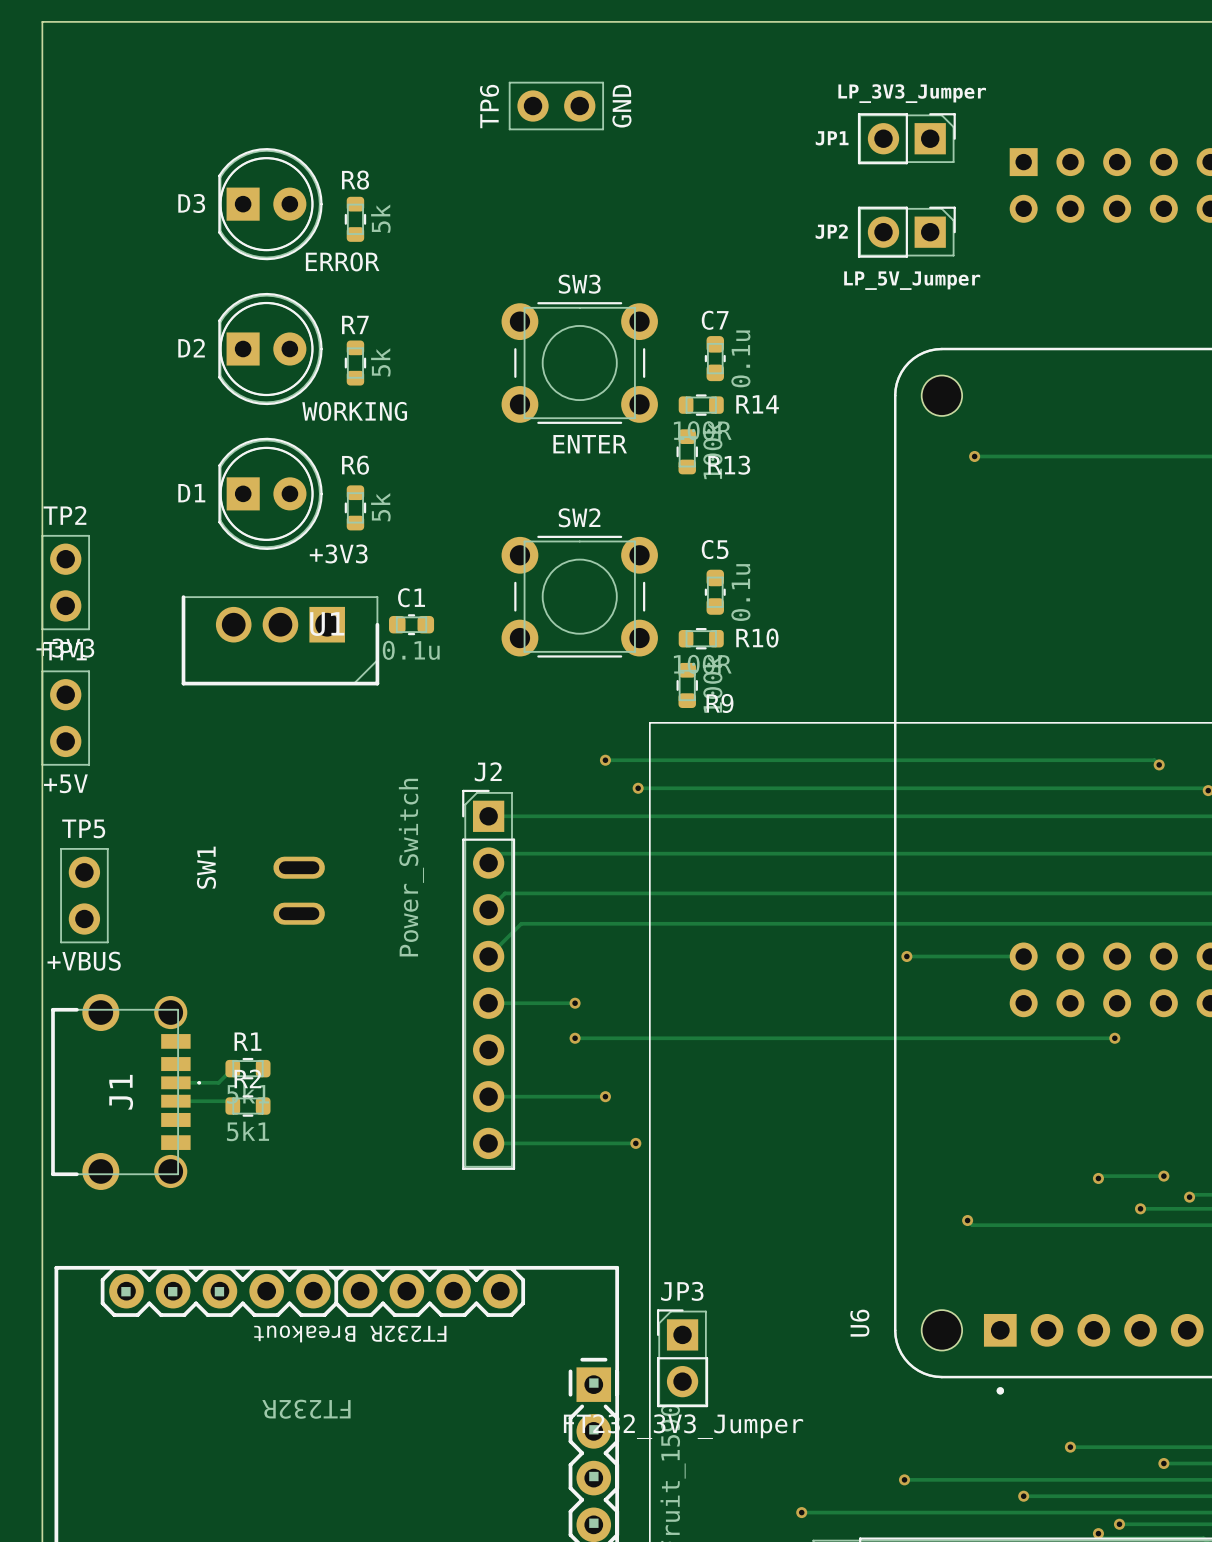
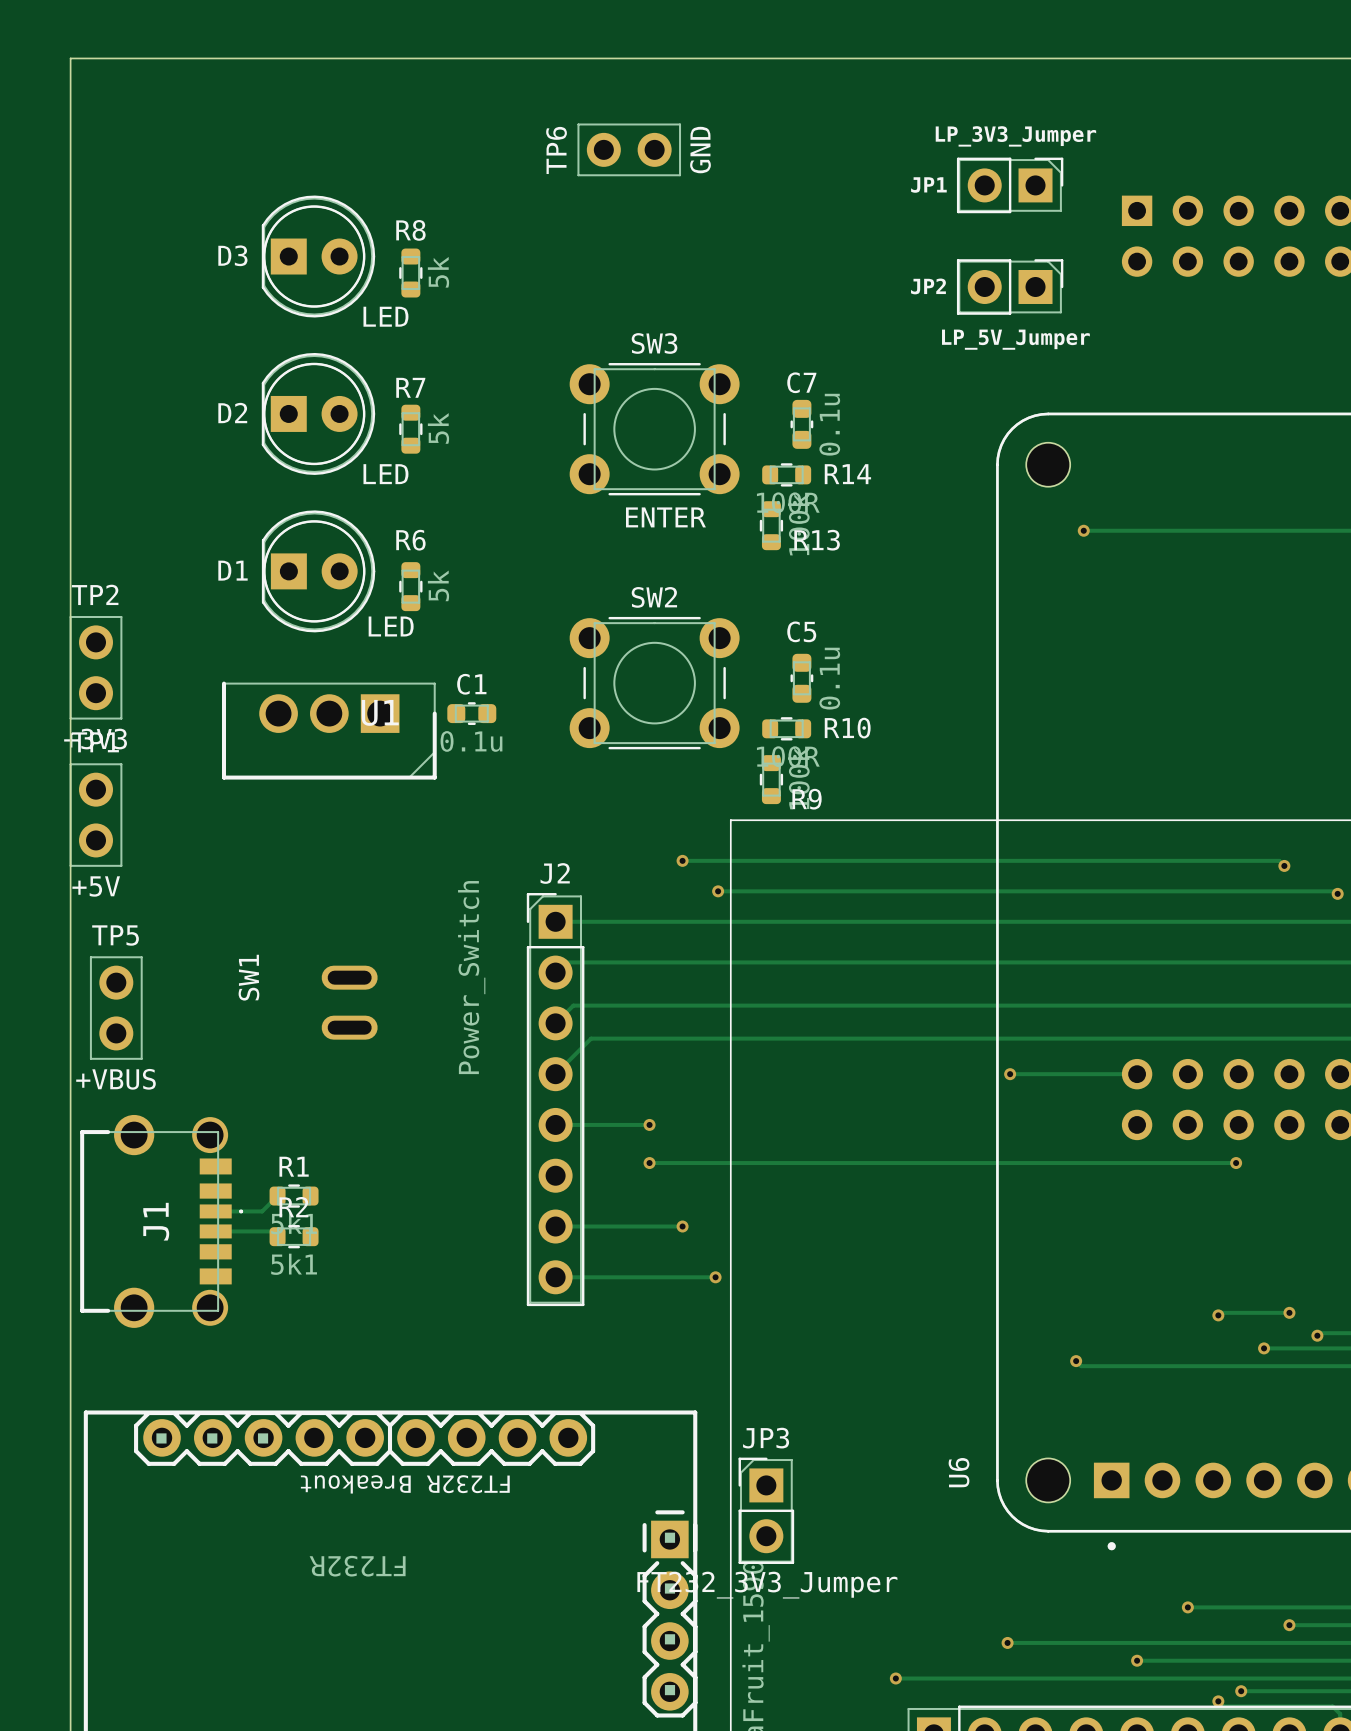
D3 value: ERROR (342, 261) -> LED (385, 316)
D2 value: WORKING (354, 411) -> LED (385, 474)
D1 value: +3V3 (338, 553) -> LED (391, 626)

